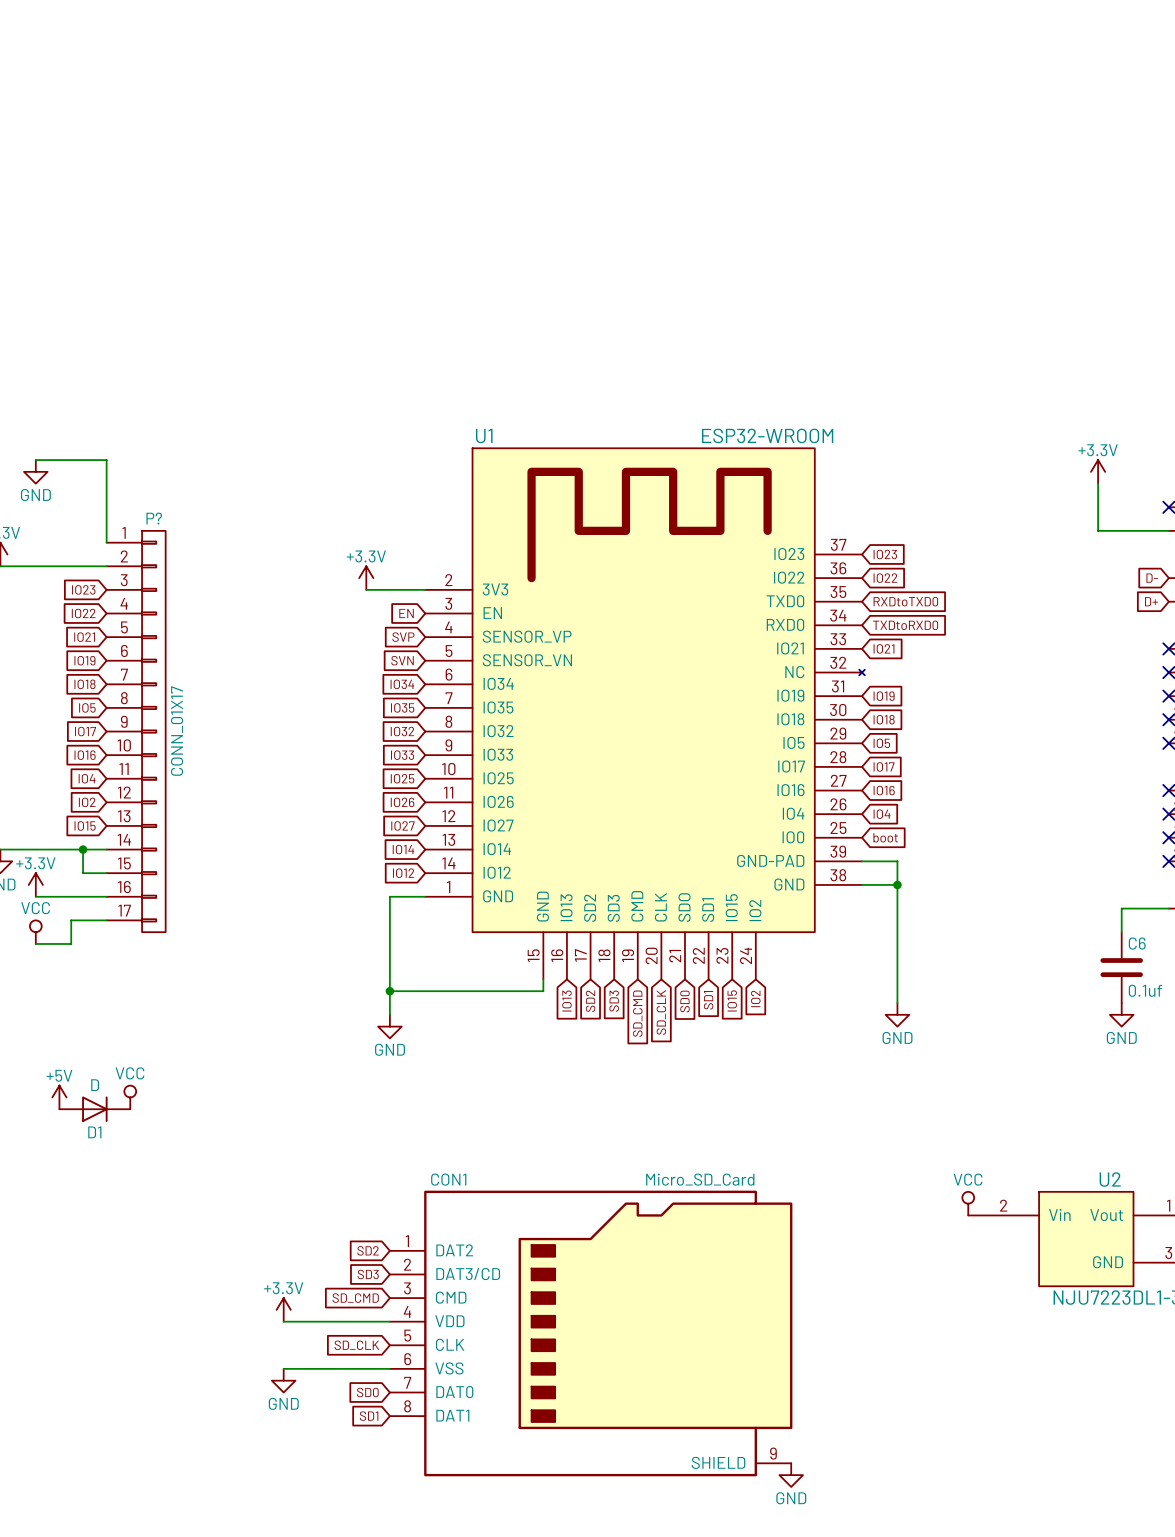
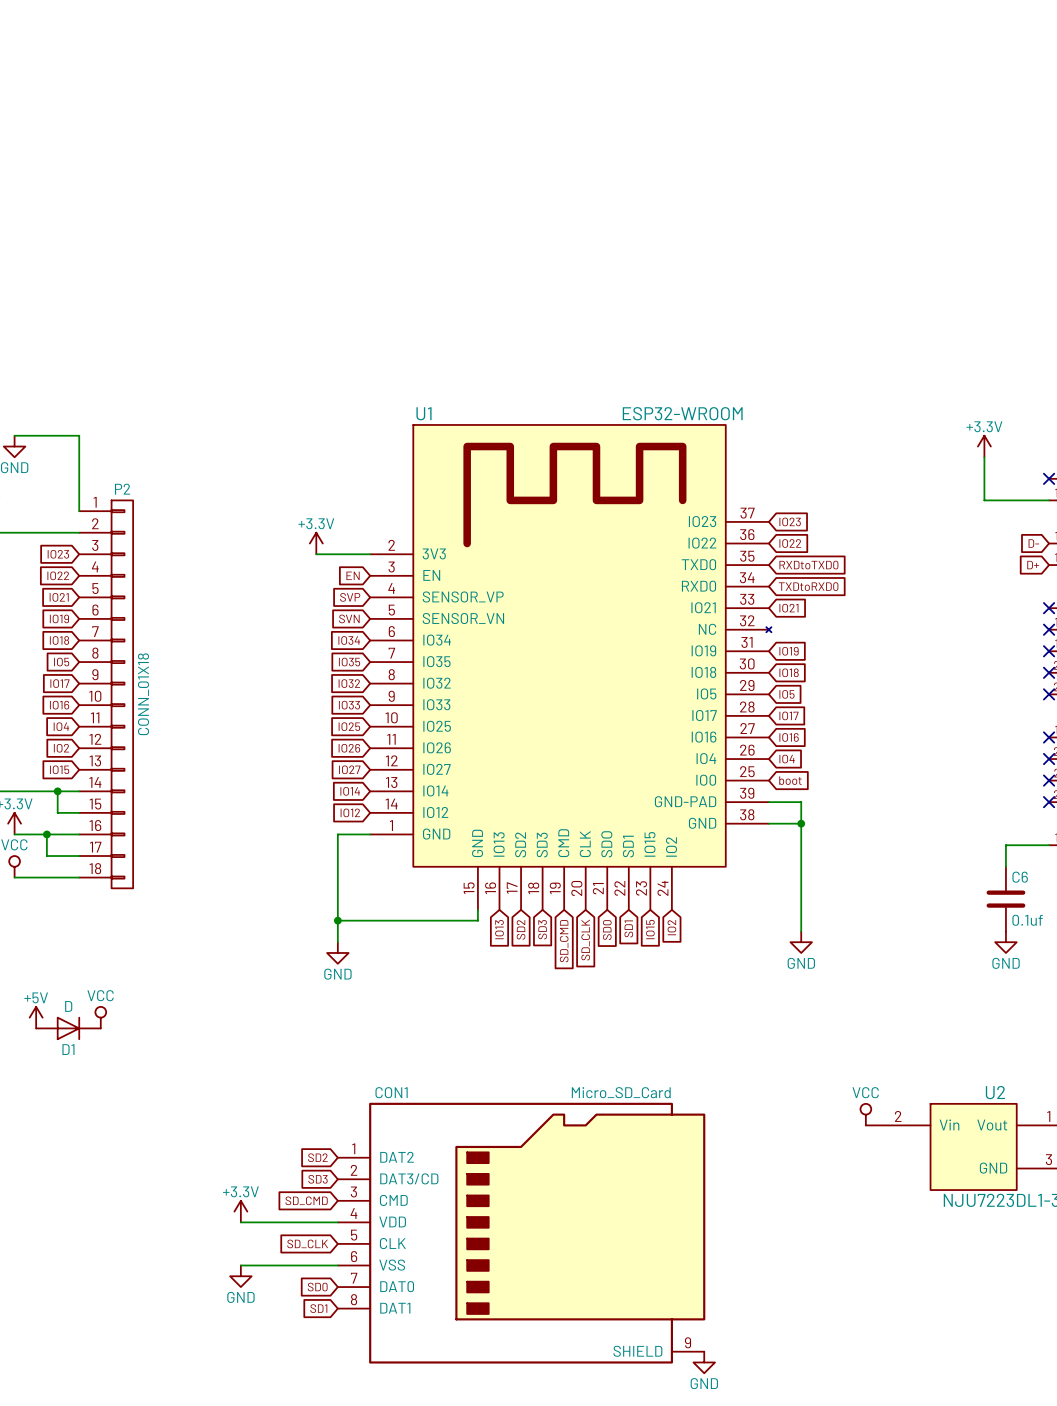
P?: CONN_01X17 (136, 731) -> none
P2: none -> CONN_01X18 (106, 694)
wire: none -> (46, 834) (46, 856)
junction: none -> (46, 834)
wire: (71, 920) (71, 943) -> (79, 877) (46, 877)

